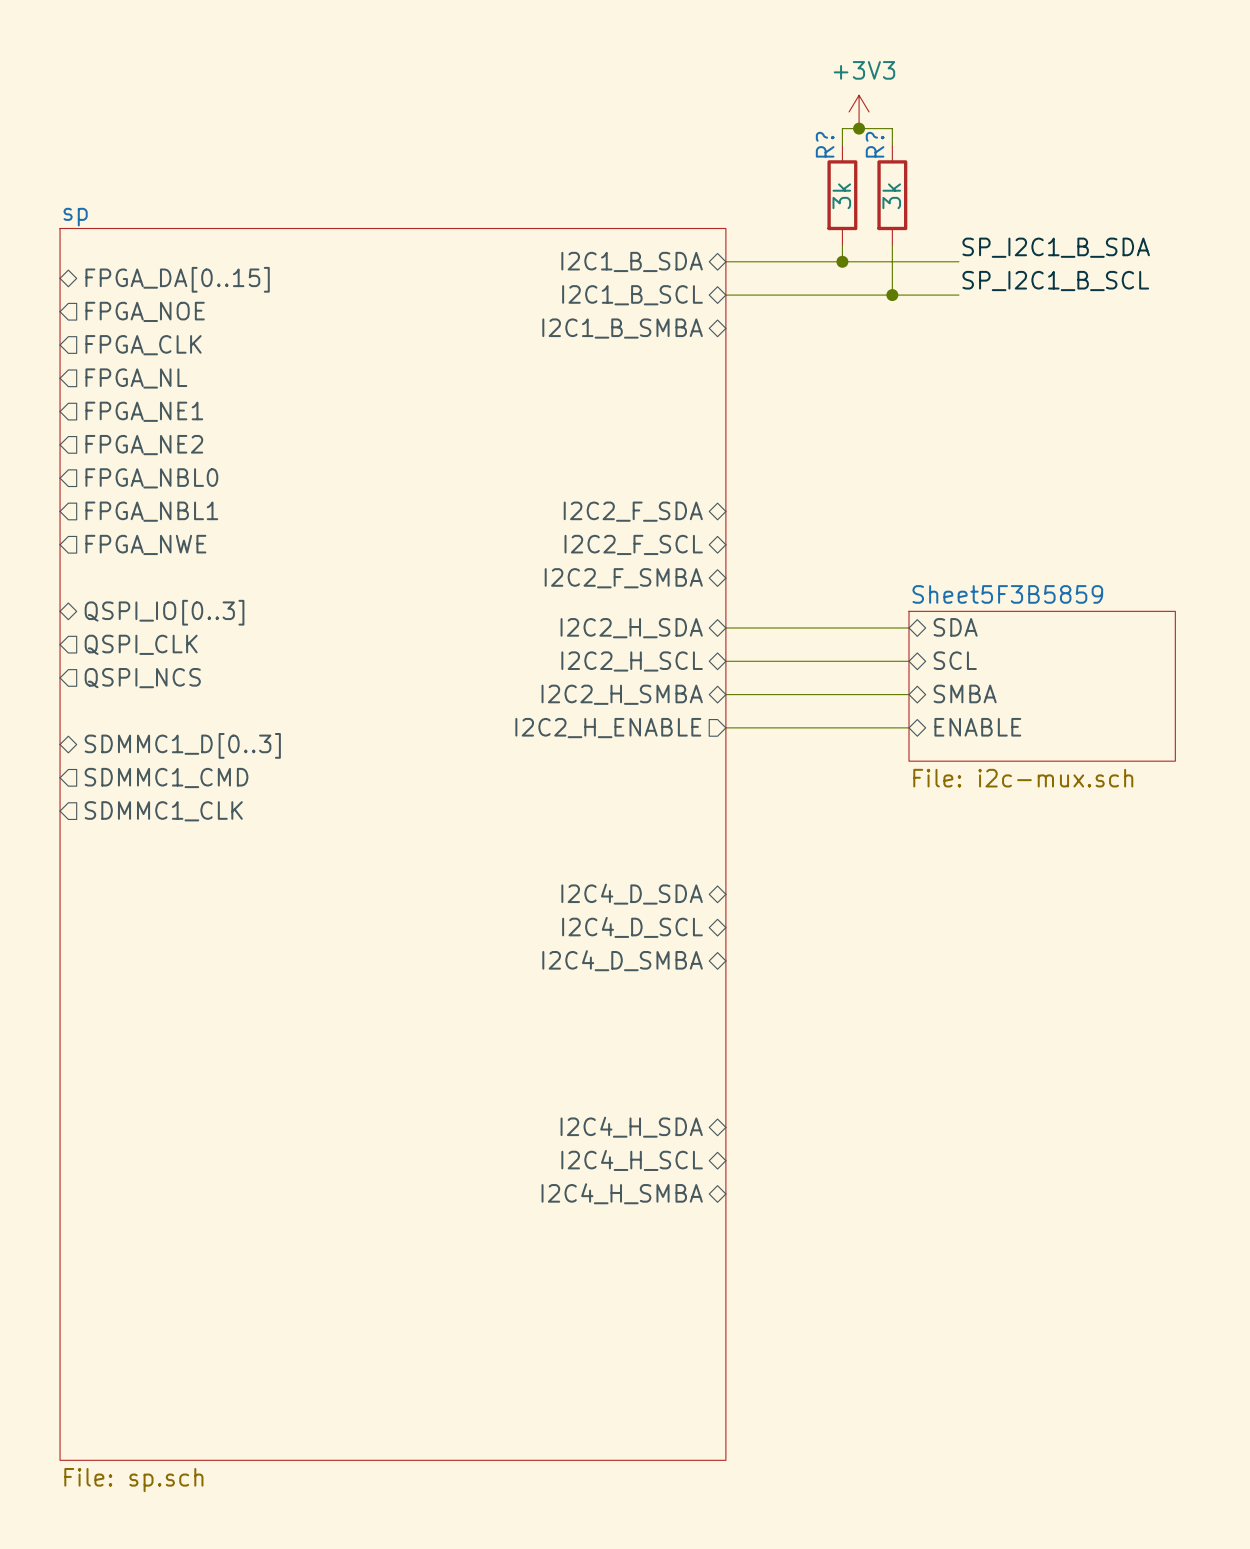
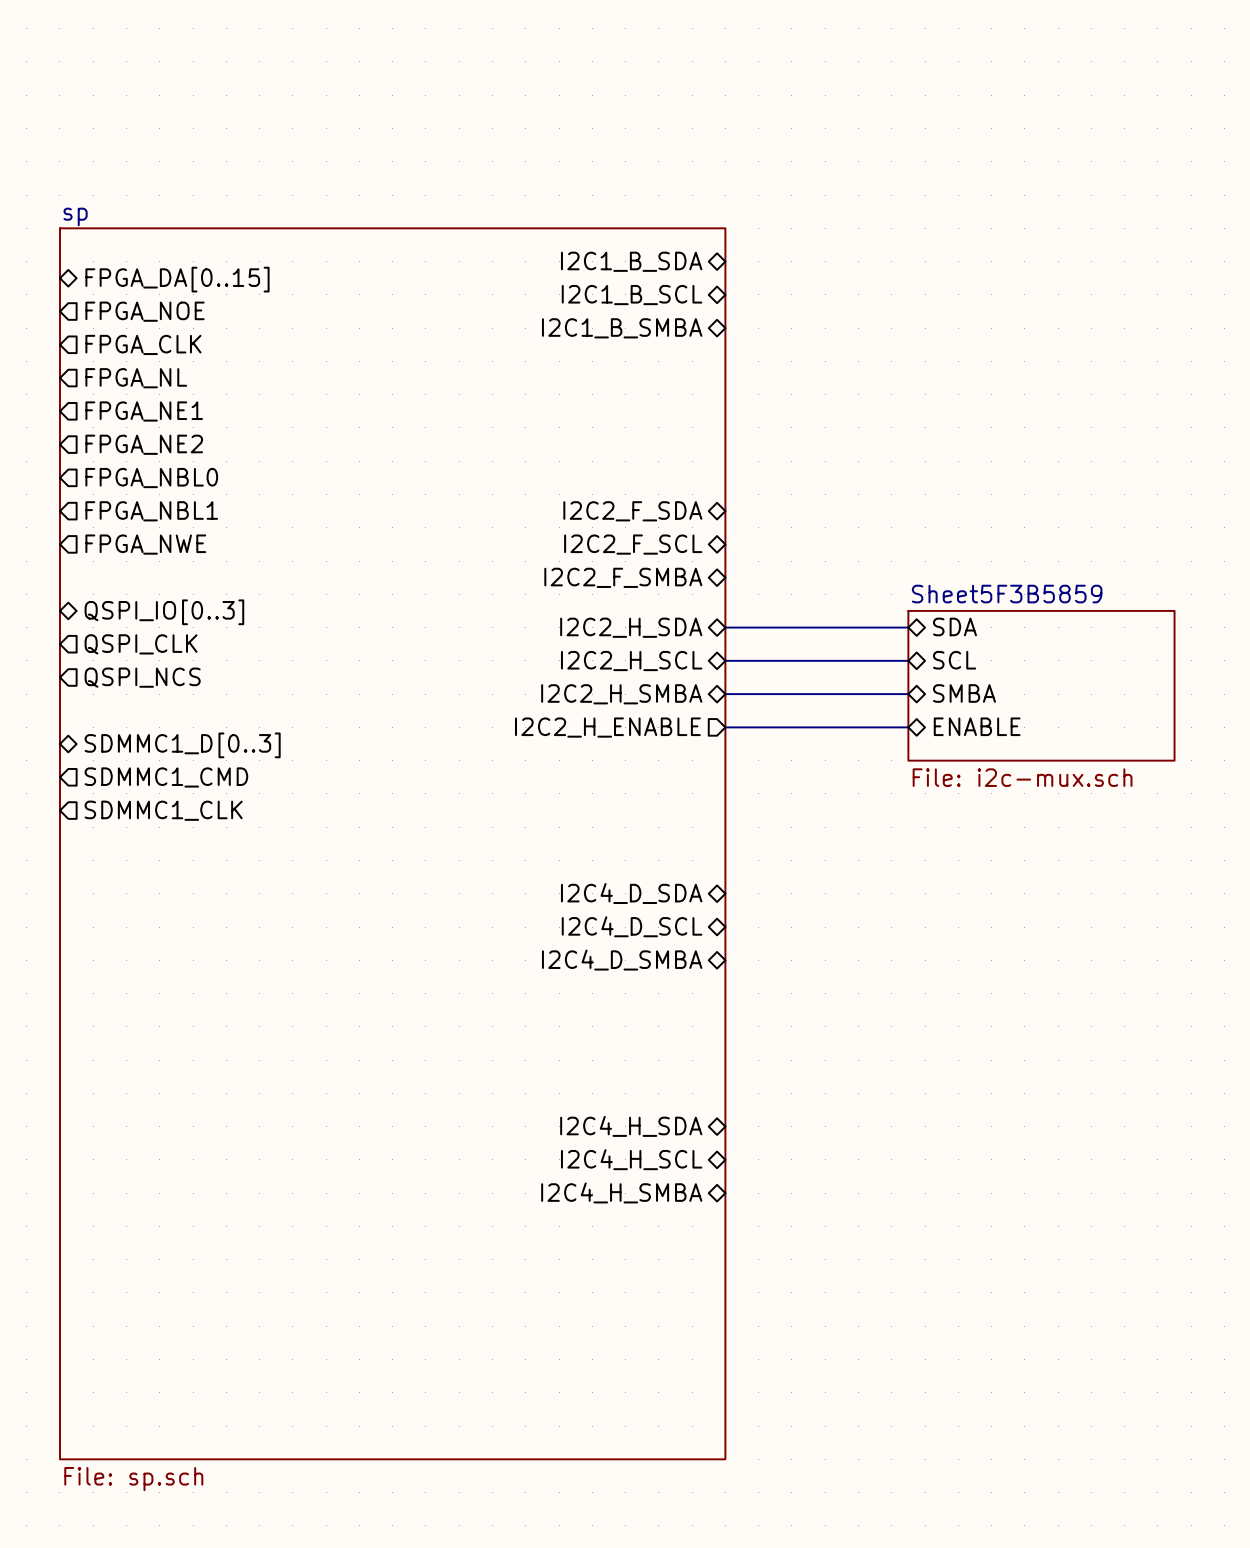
power symbol: +3V3 (859, 111) -> none
junction: (859, 128) -> none
wire: (842, 145) (842, 128) (892, 128) (892, 145) -> none
R?: 3k (842, 195) -> none
R?: 3k (892, 195) -> none
wire: (842, 245) (842, 261) -> none
wire: (892, 245) (892, 295) -> none
label: SP_I2C1_B_SDA (1056, 247) -> none
wire: (725, 261) (958, 261) -> none
junction: (842, 261) -> none
label: SP_I2C1_B_SCL (1055, 281) -> none
wire: (725, 295) (958, 295) -> none
junction: (892, 295) -> none

